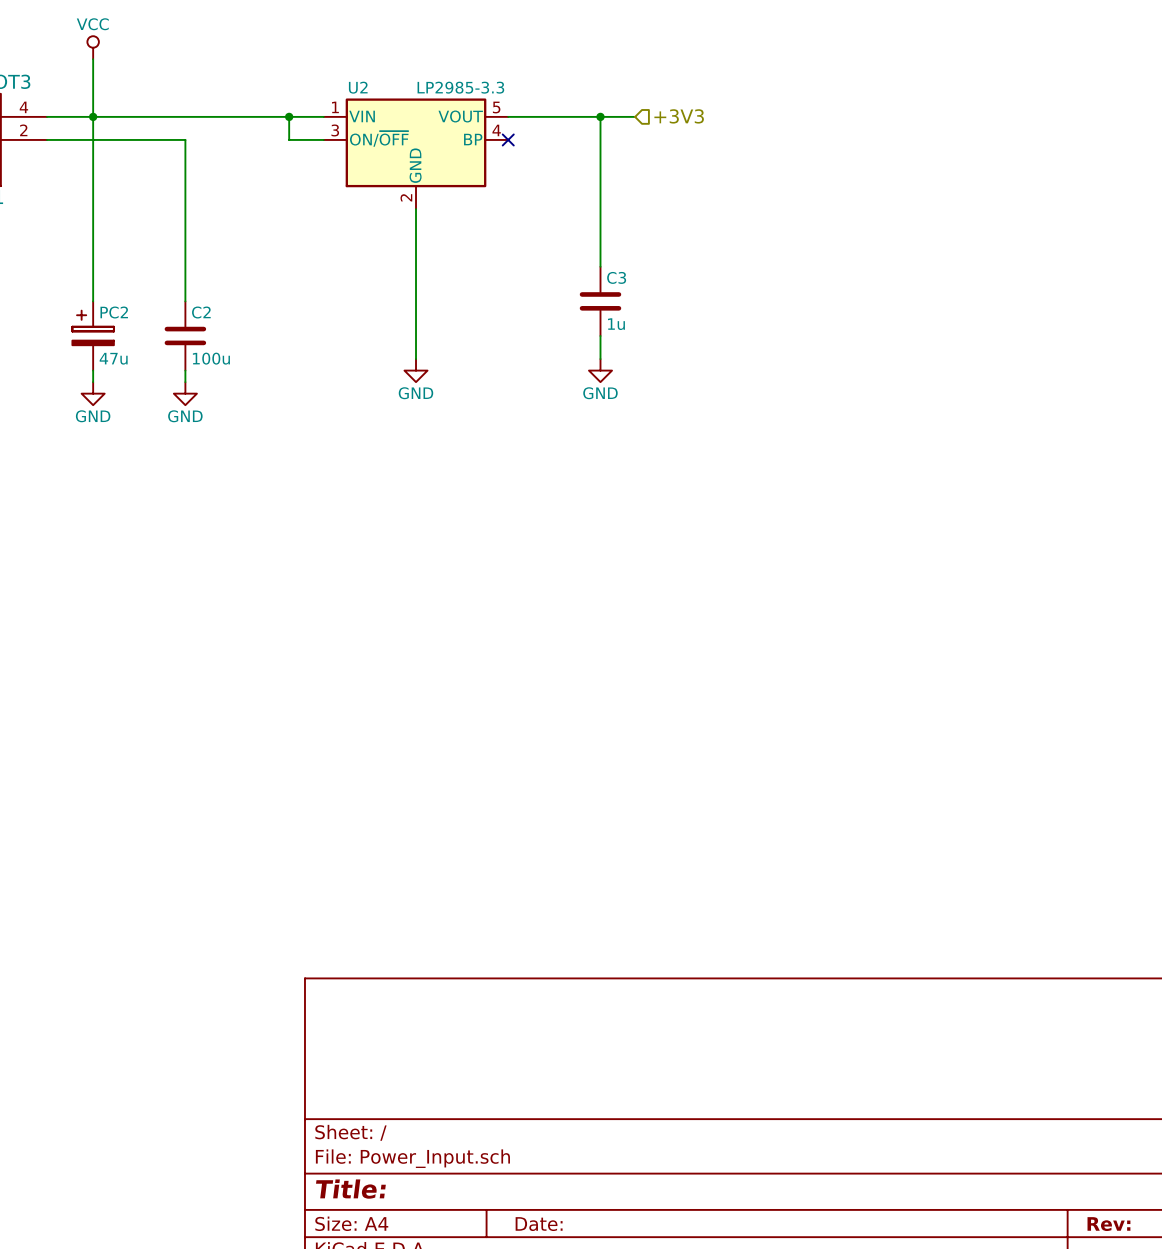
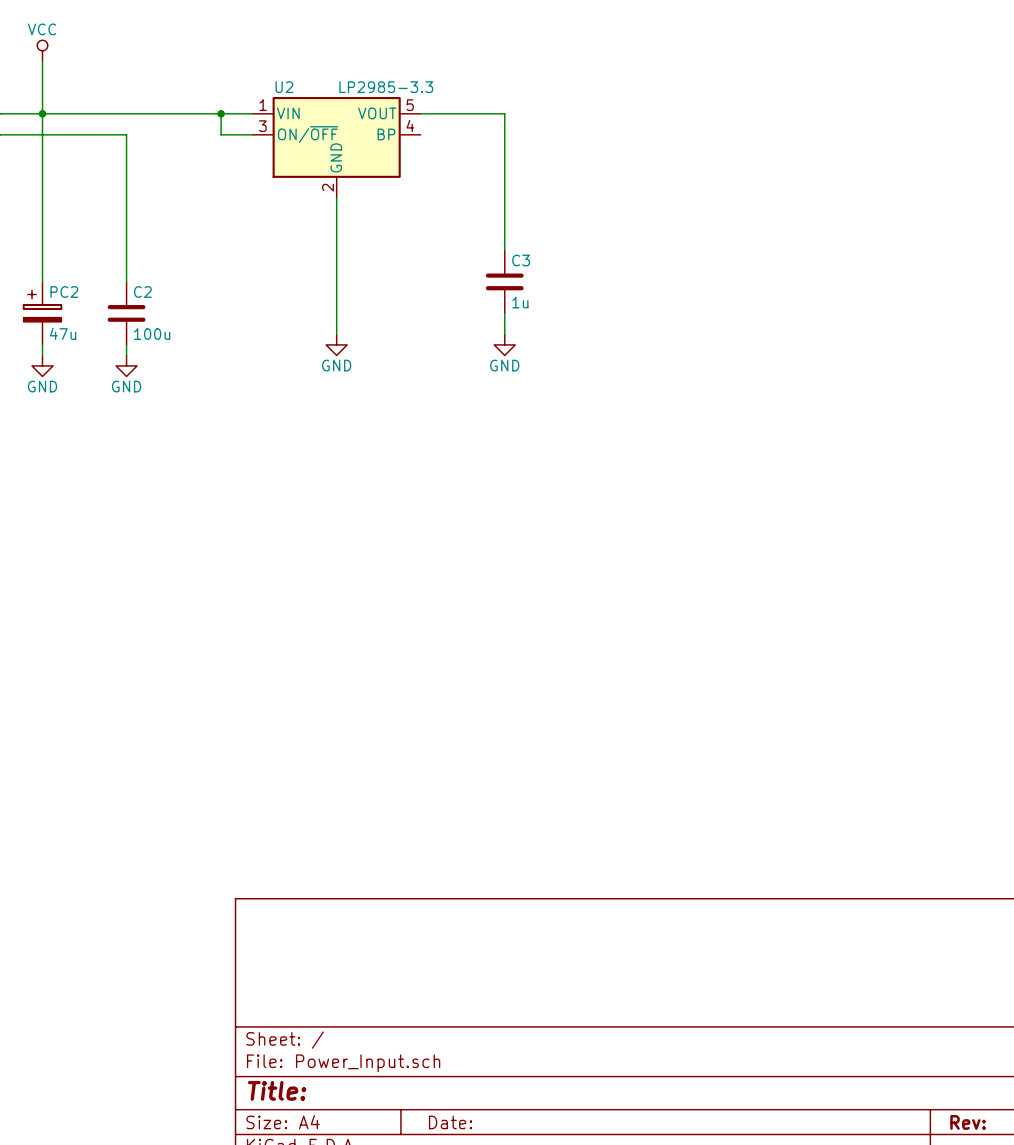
wire: (600, 116) (635, 116) -> none
junction: (600, 116) -> none
hierarchical label: +3V3 (679, 116) -> none
no-connect mark: (508, 139) -> none

